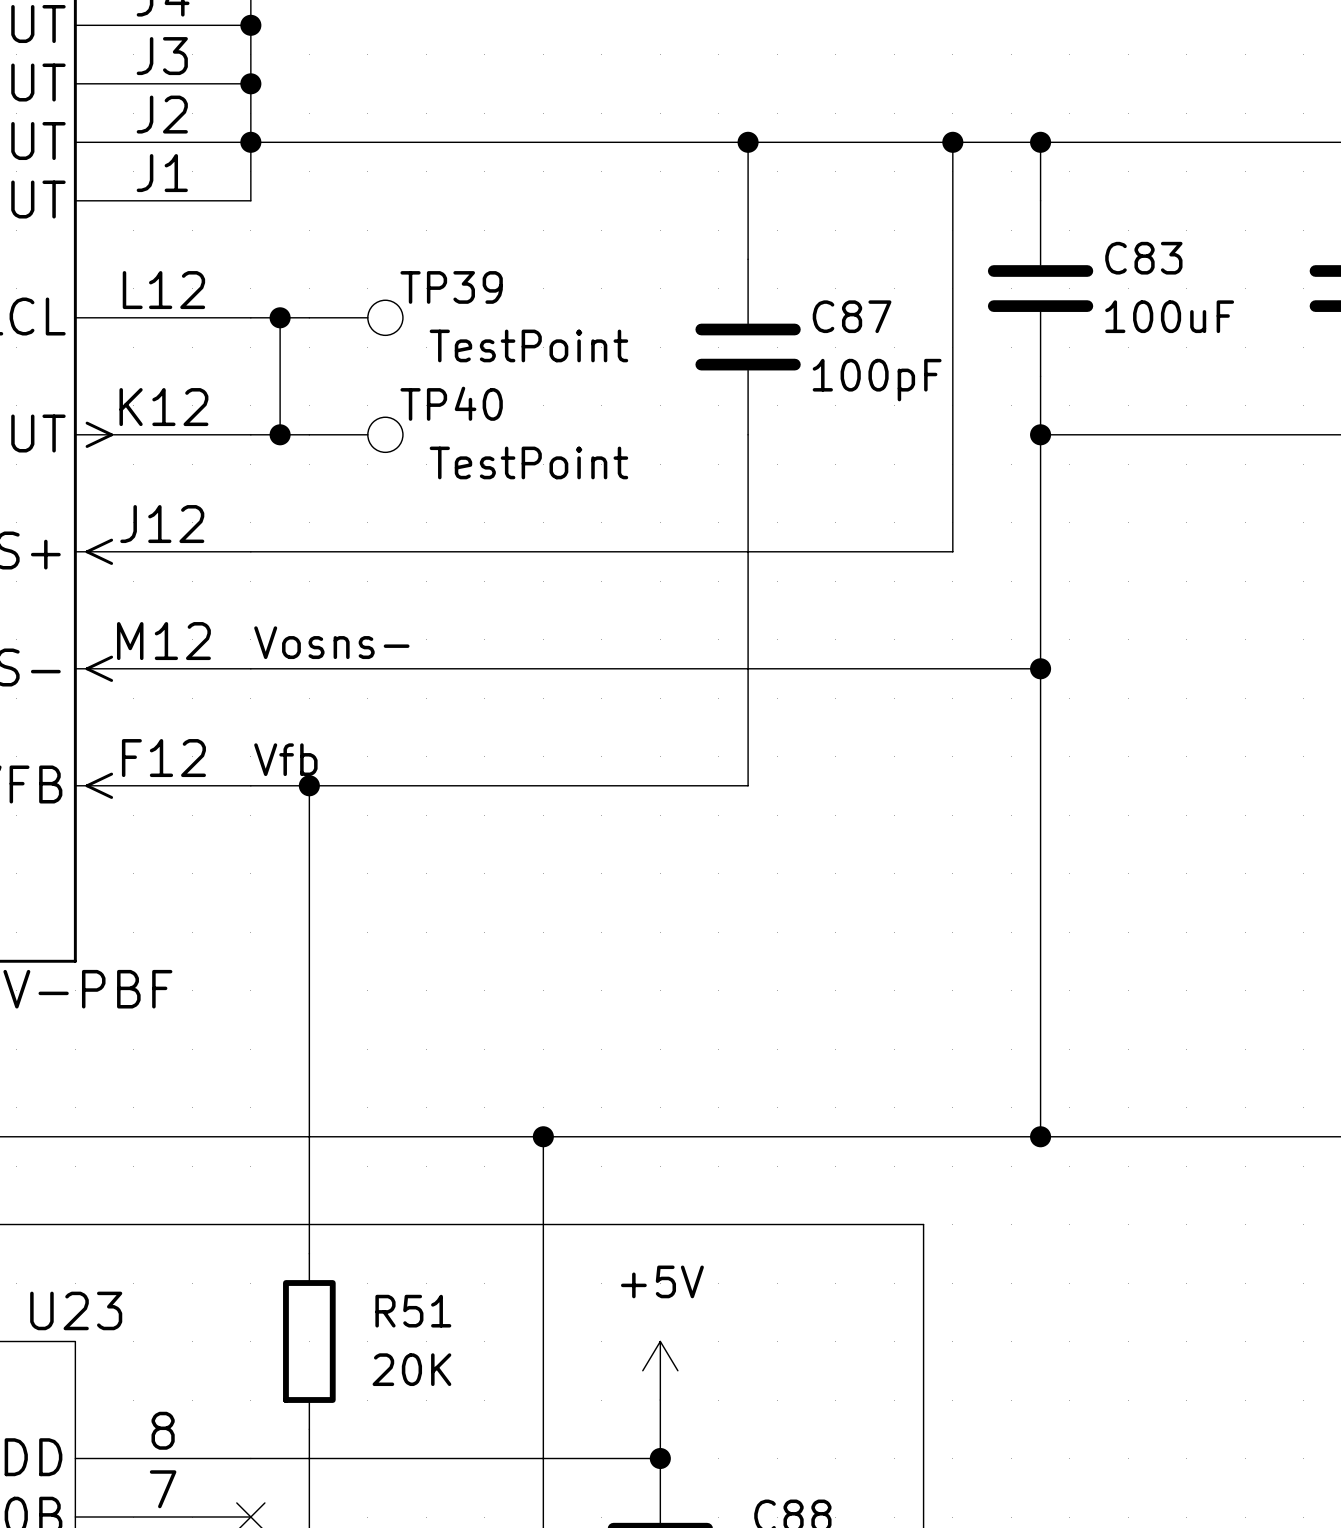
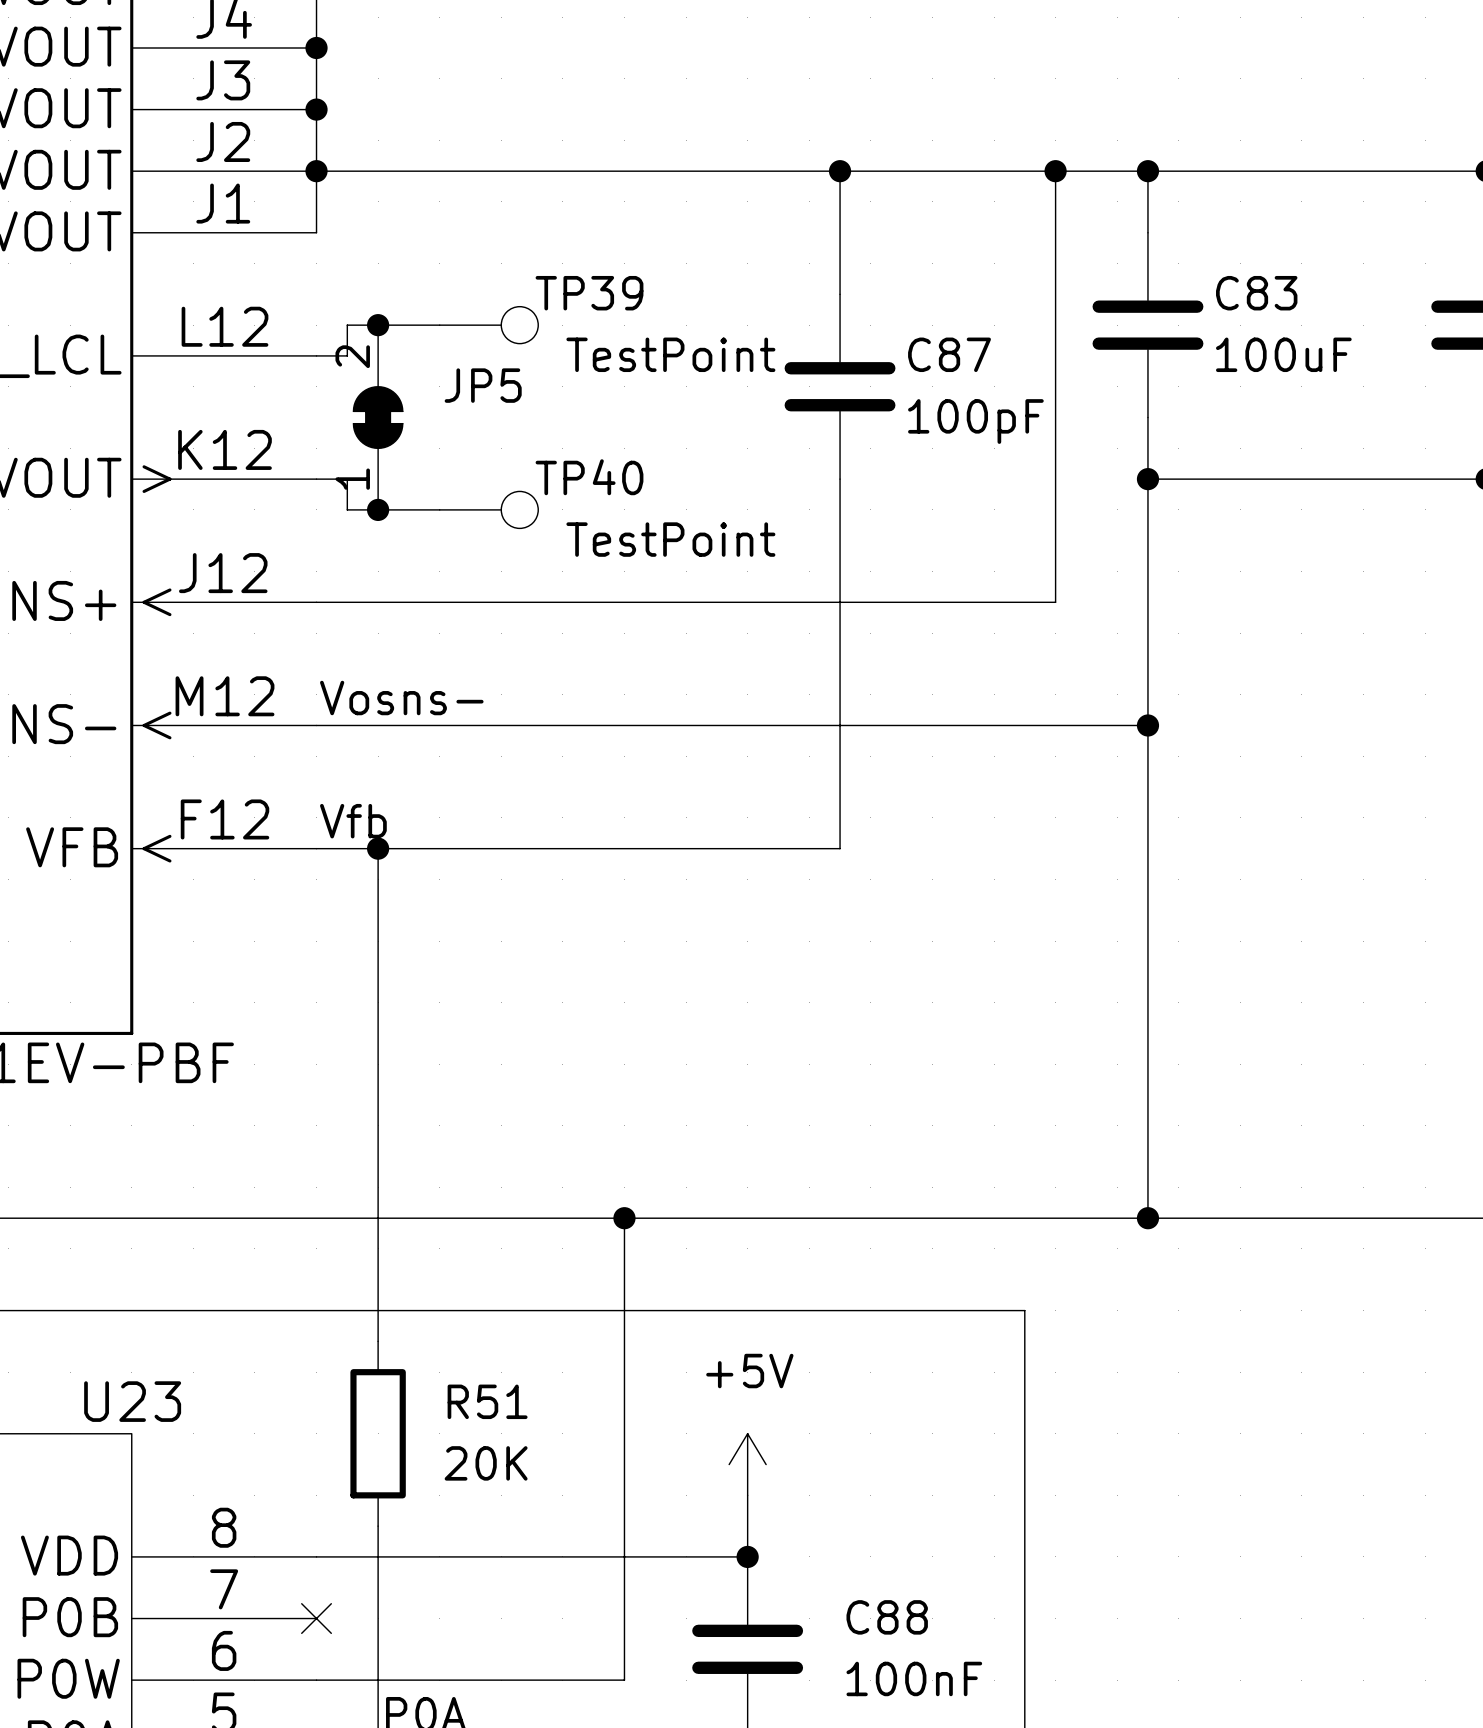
wire: none -> (439, 325) (347, 325) (347, 355)
junction position: (280, 317) -> (378, 325)
wire: (309, 317) (280, 317) (280, 434) (309, 434) -> none
TP39 position: (356, 317) -> (488, 325)
JP5: none -> (378, 417)
wire: none -> (347, 479) (347, 509) (439, 509)
junction position: (280, 434) -> (378, 509)
TP40 position: (356, 434) -> (488, 509)

